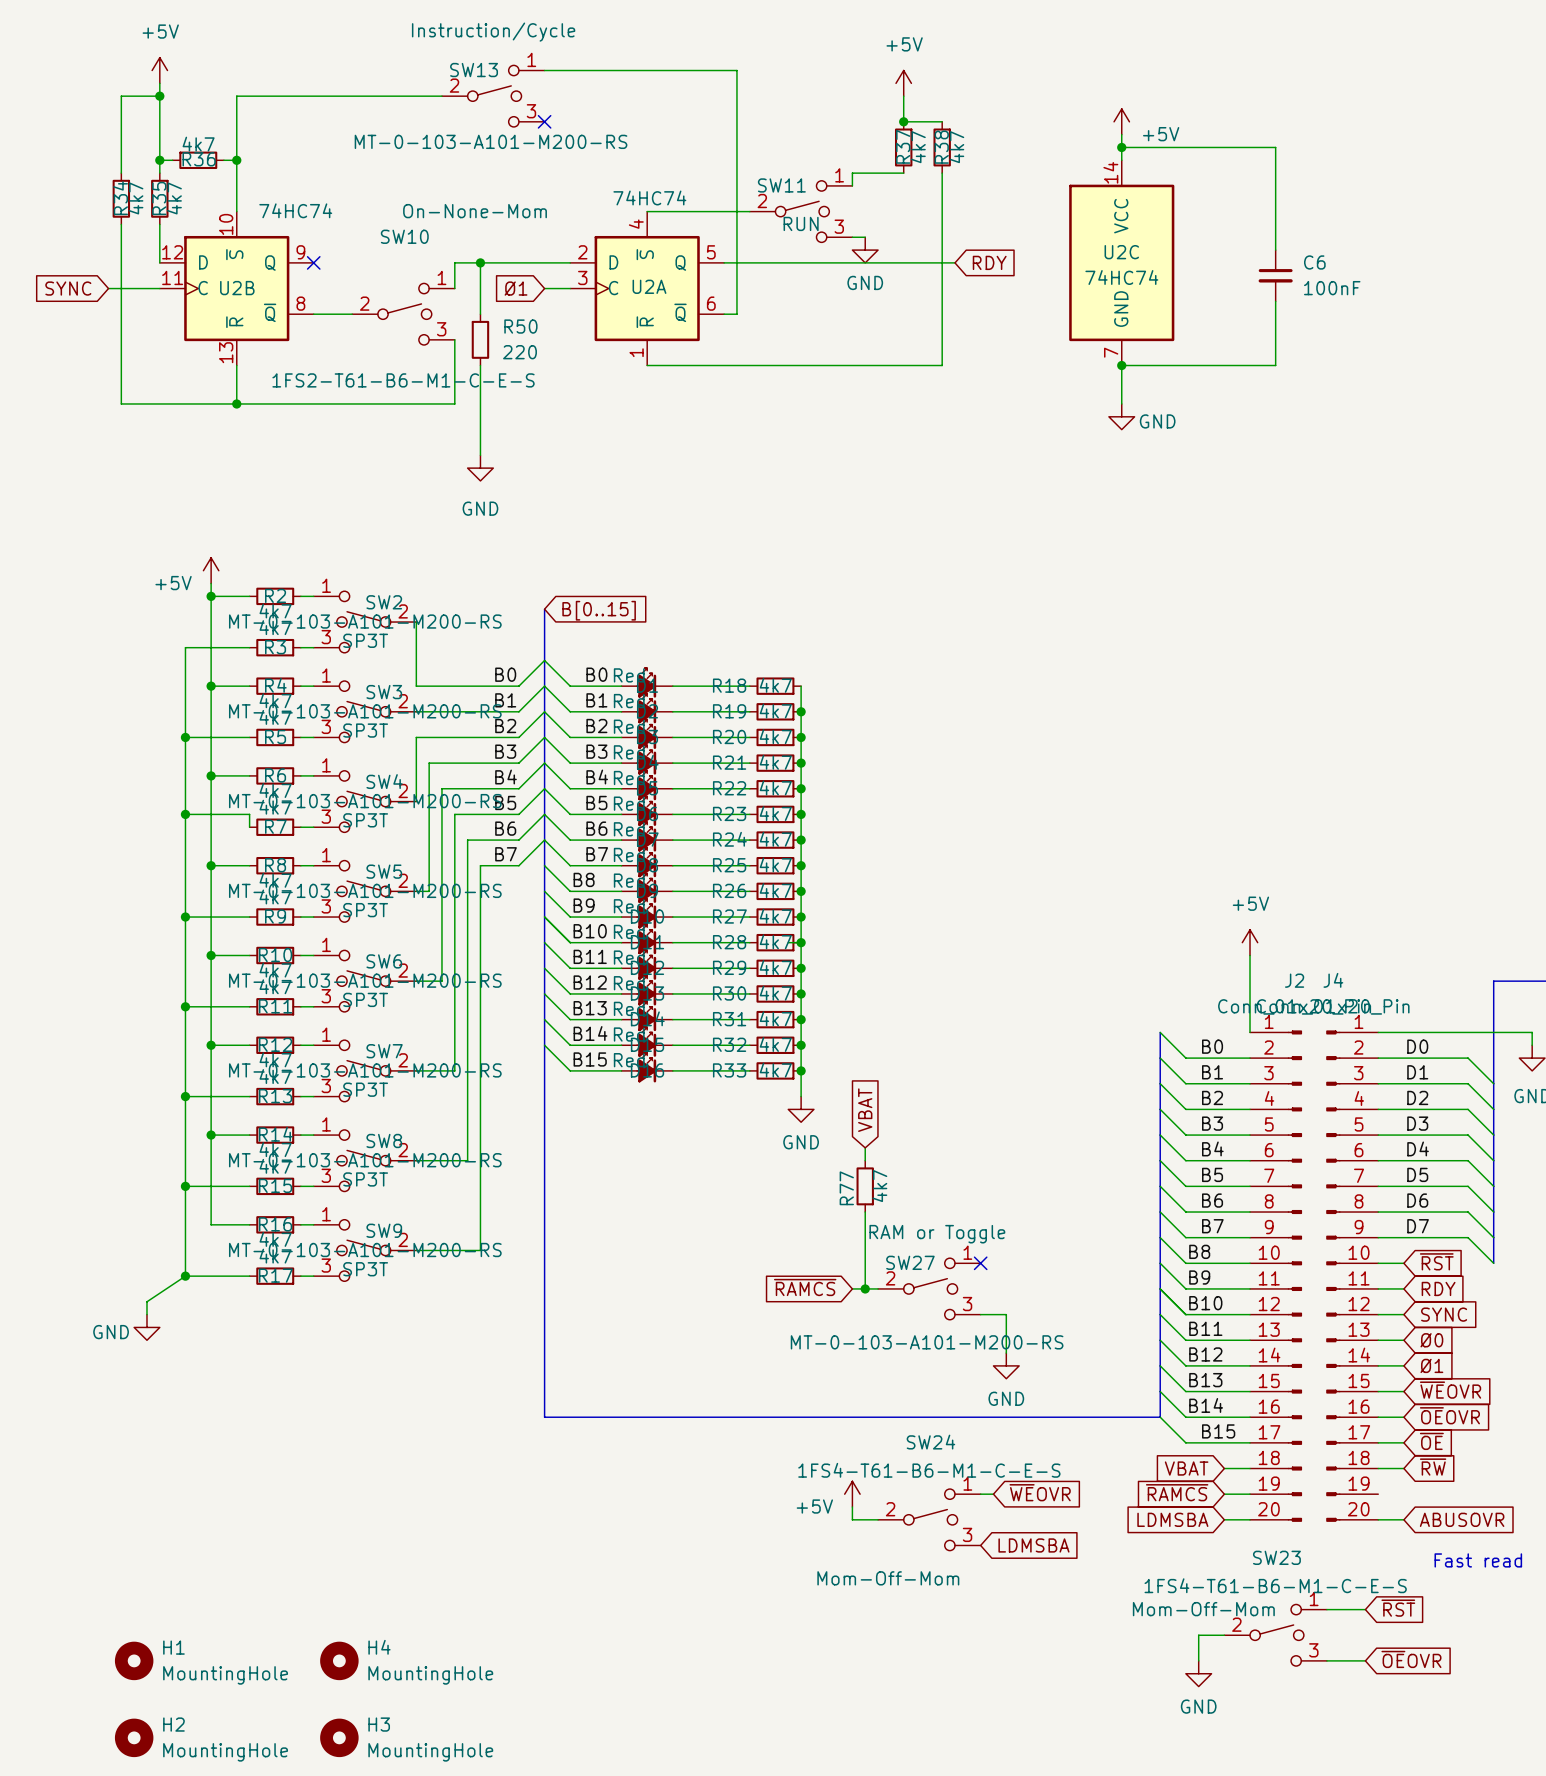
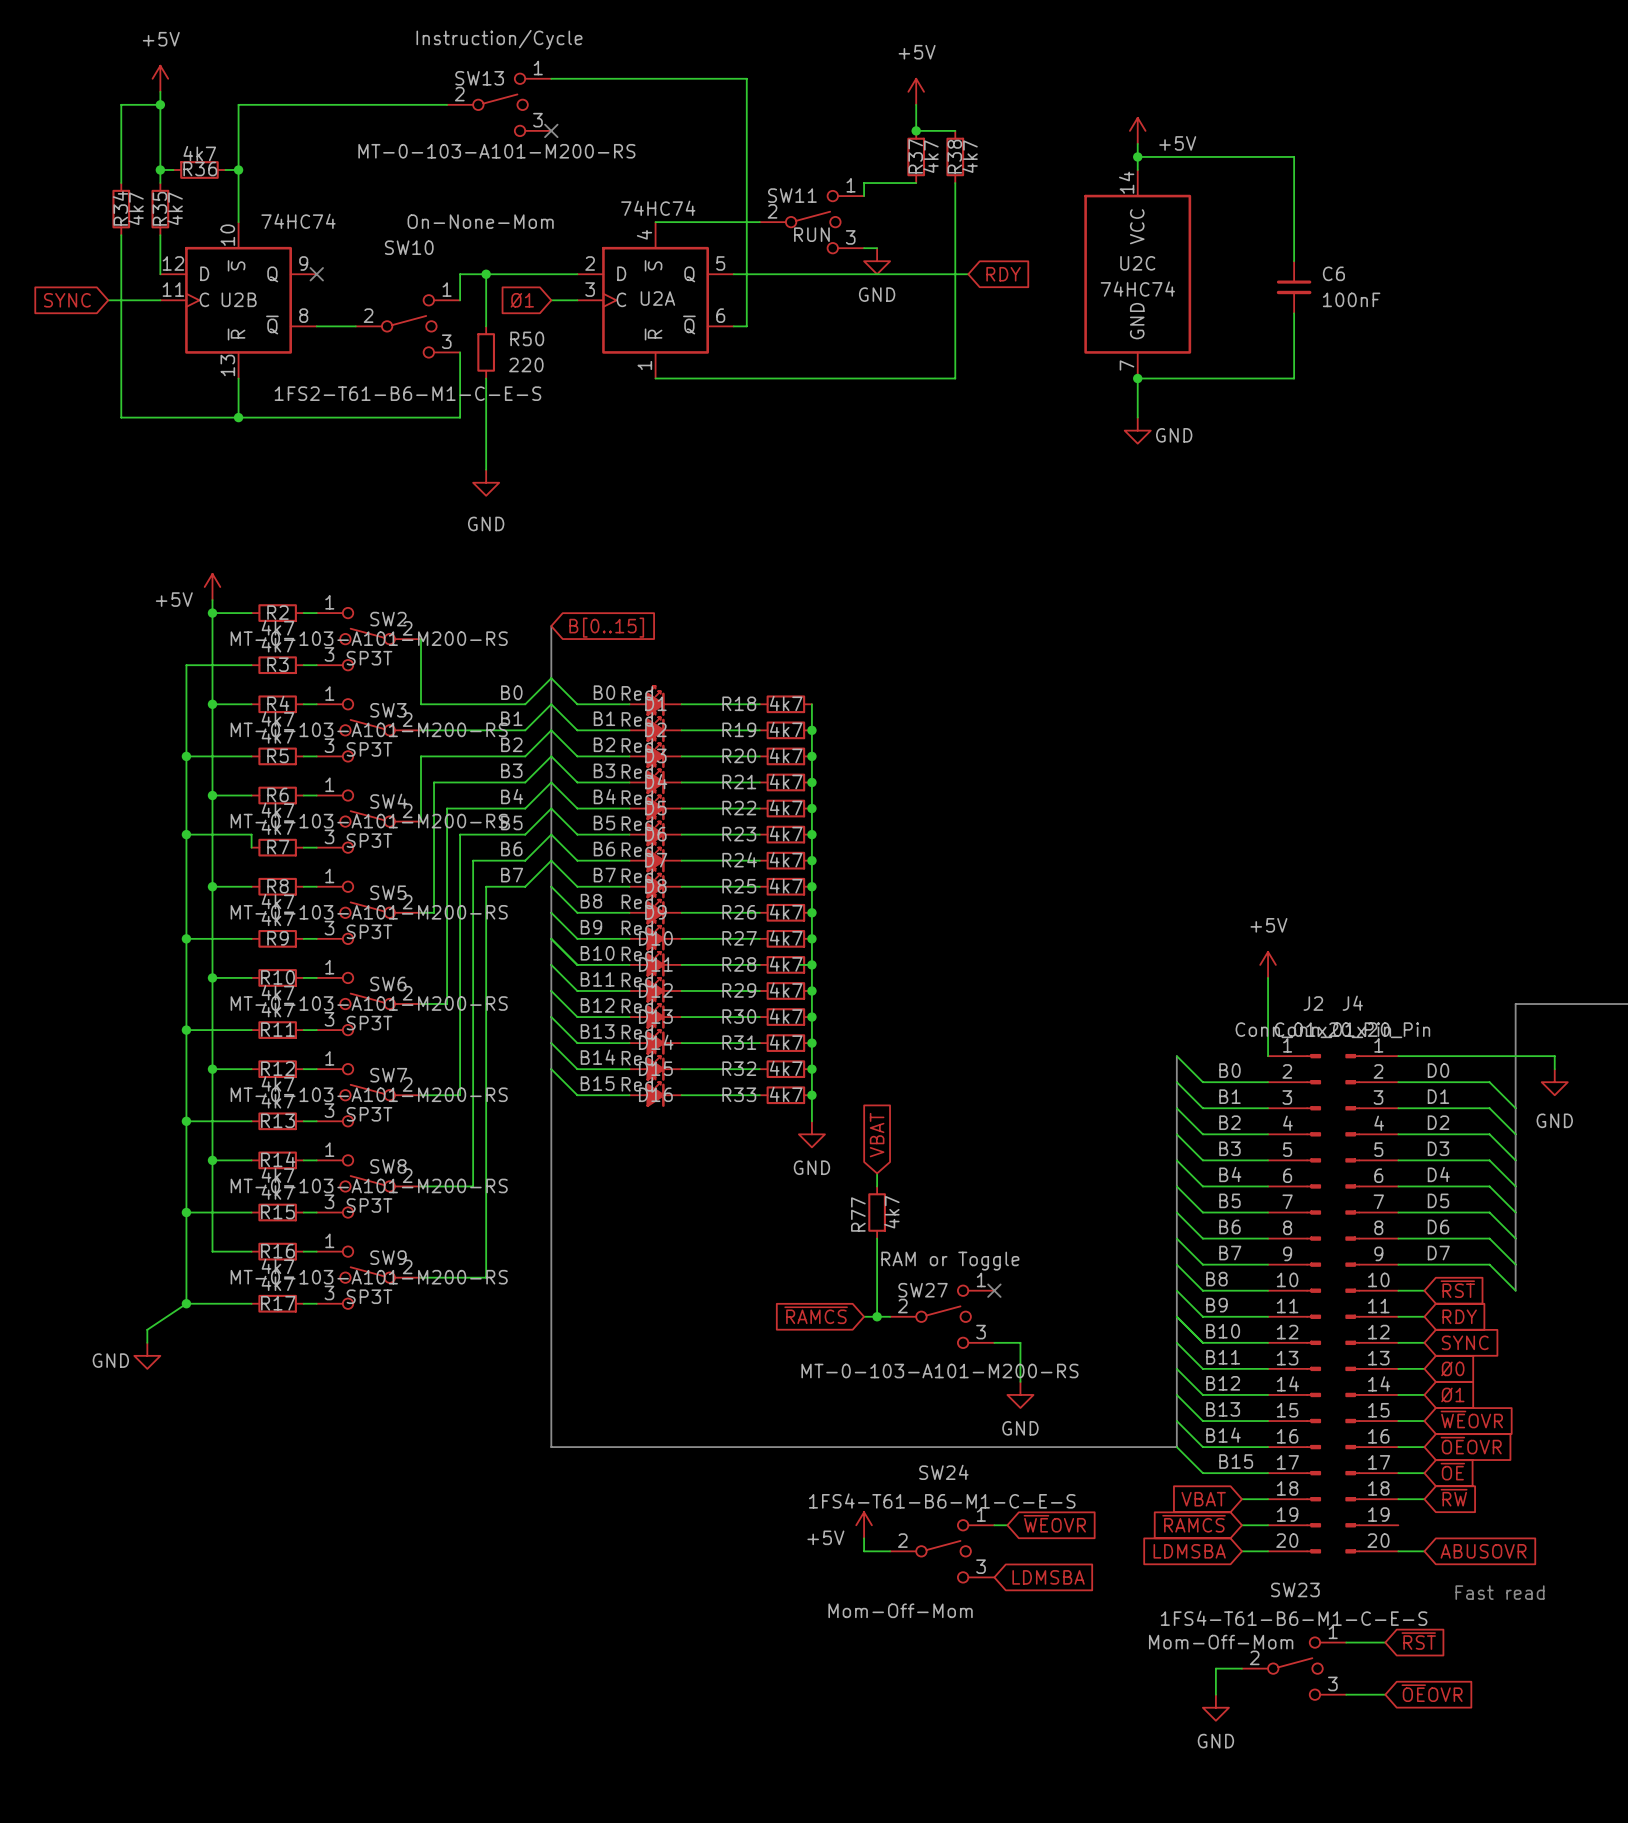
H1: MountingHole (134, 1660) -> none
H4: MountingHole (339, 1660) -> none
H2: MountingHole (134, 1737) -> none
H3: MountingHole (339, 1737) -> none

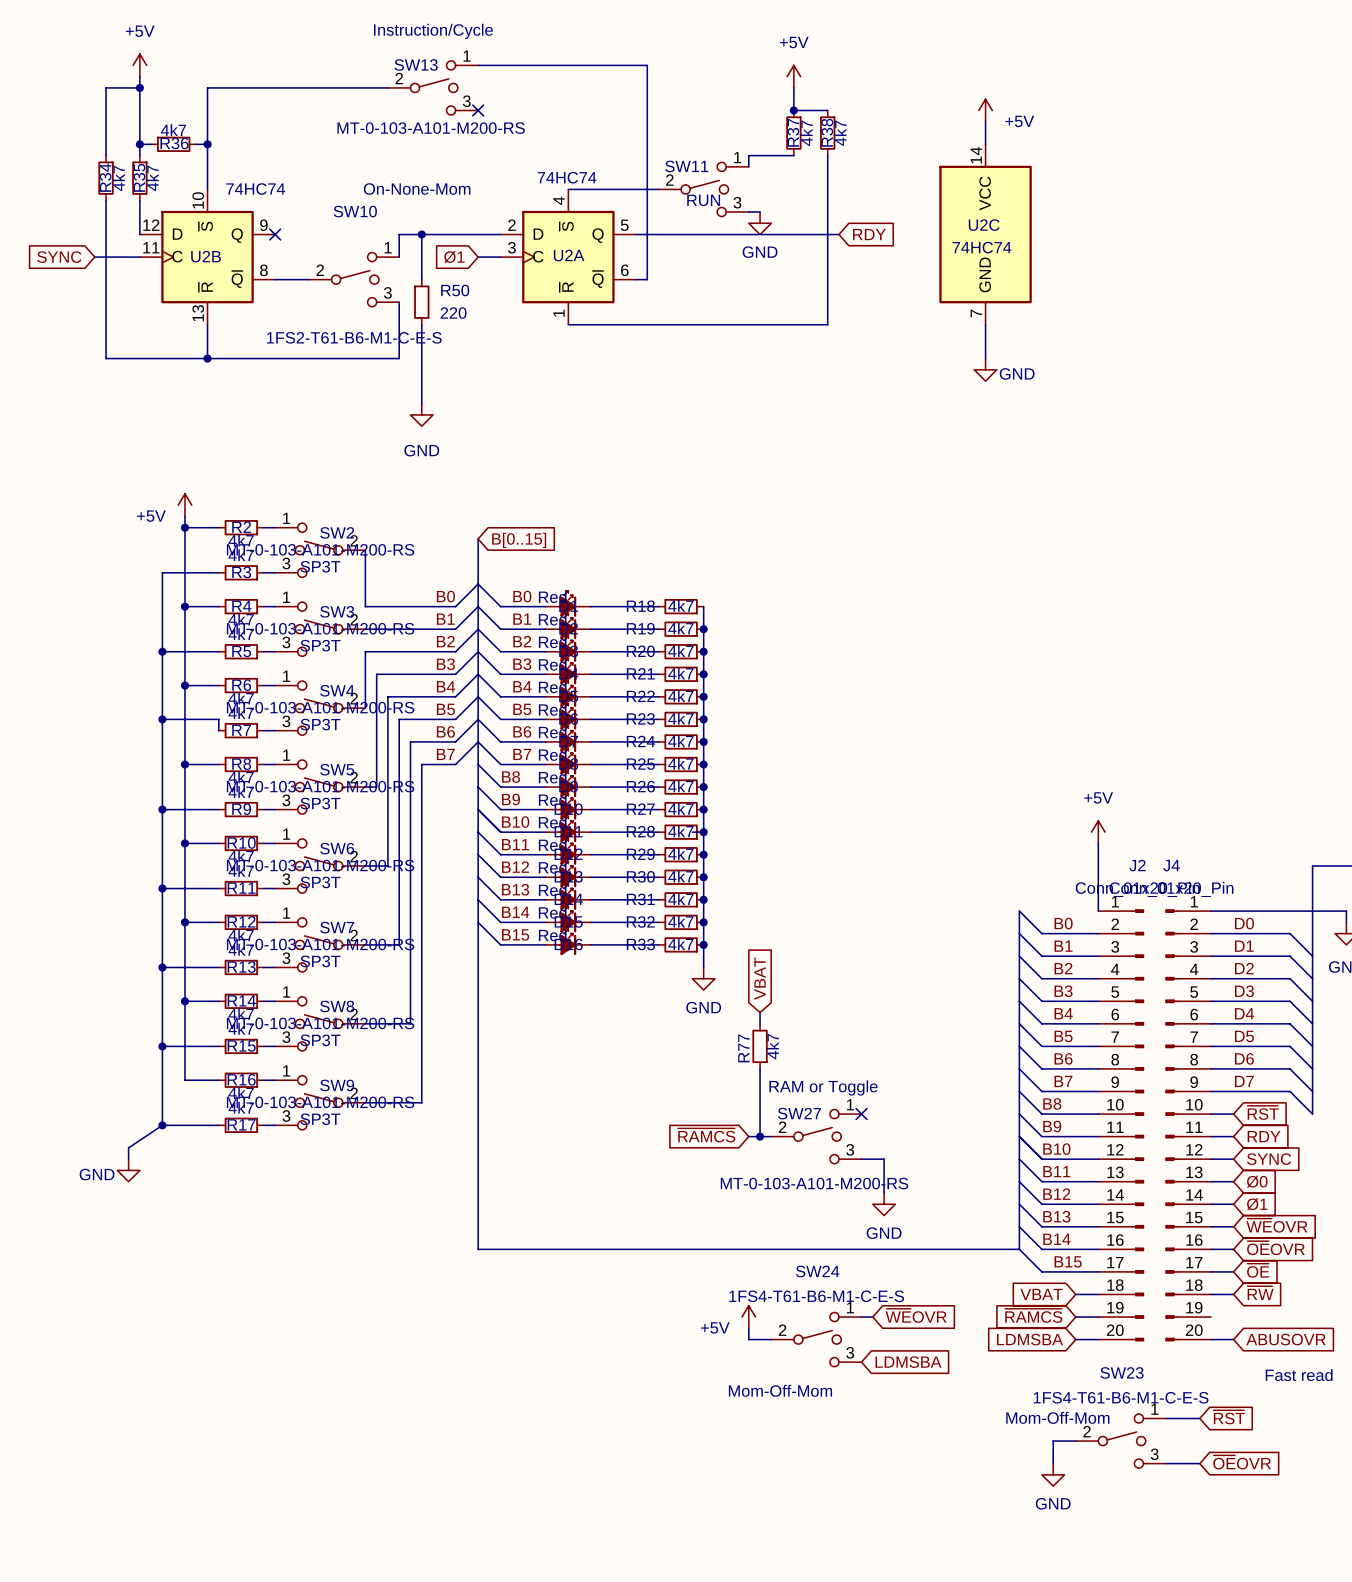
wire: (1137, 156) (1294, 156) (1294, 261) -> none
junction: (1137, 156) -> none
C6: 100nF (1294, 287) -> none
wire: (1294, 313) (1294, 378) (1137, 378) -> none
junction: (1137, 378) -> none

